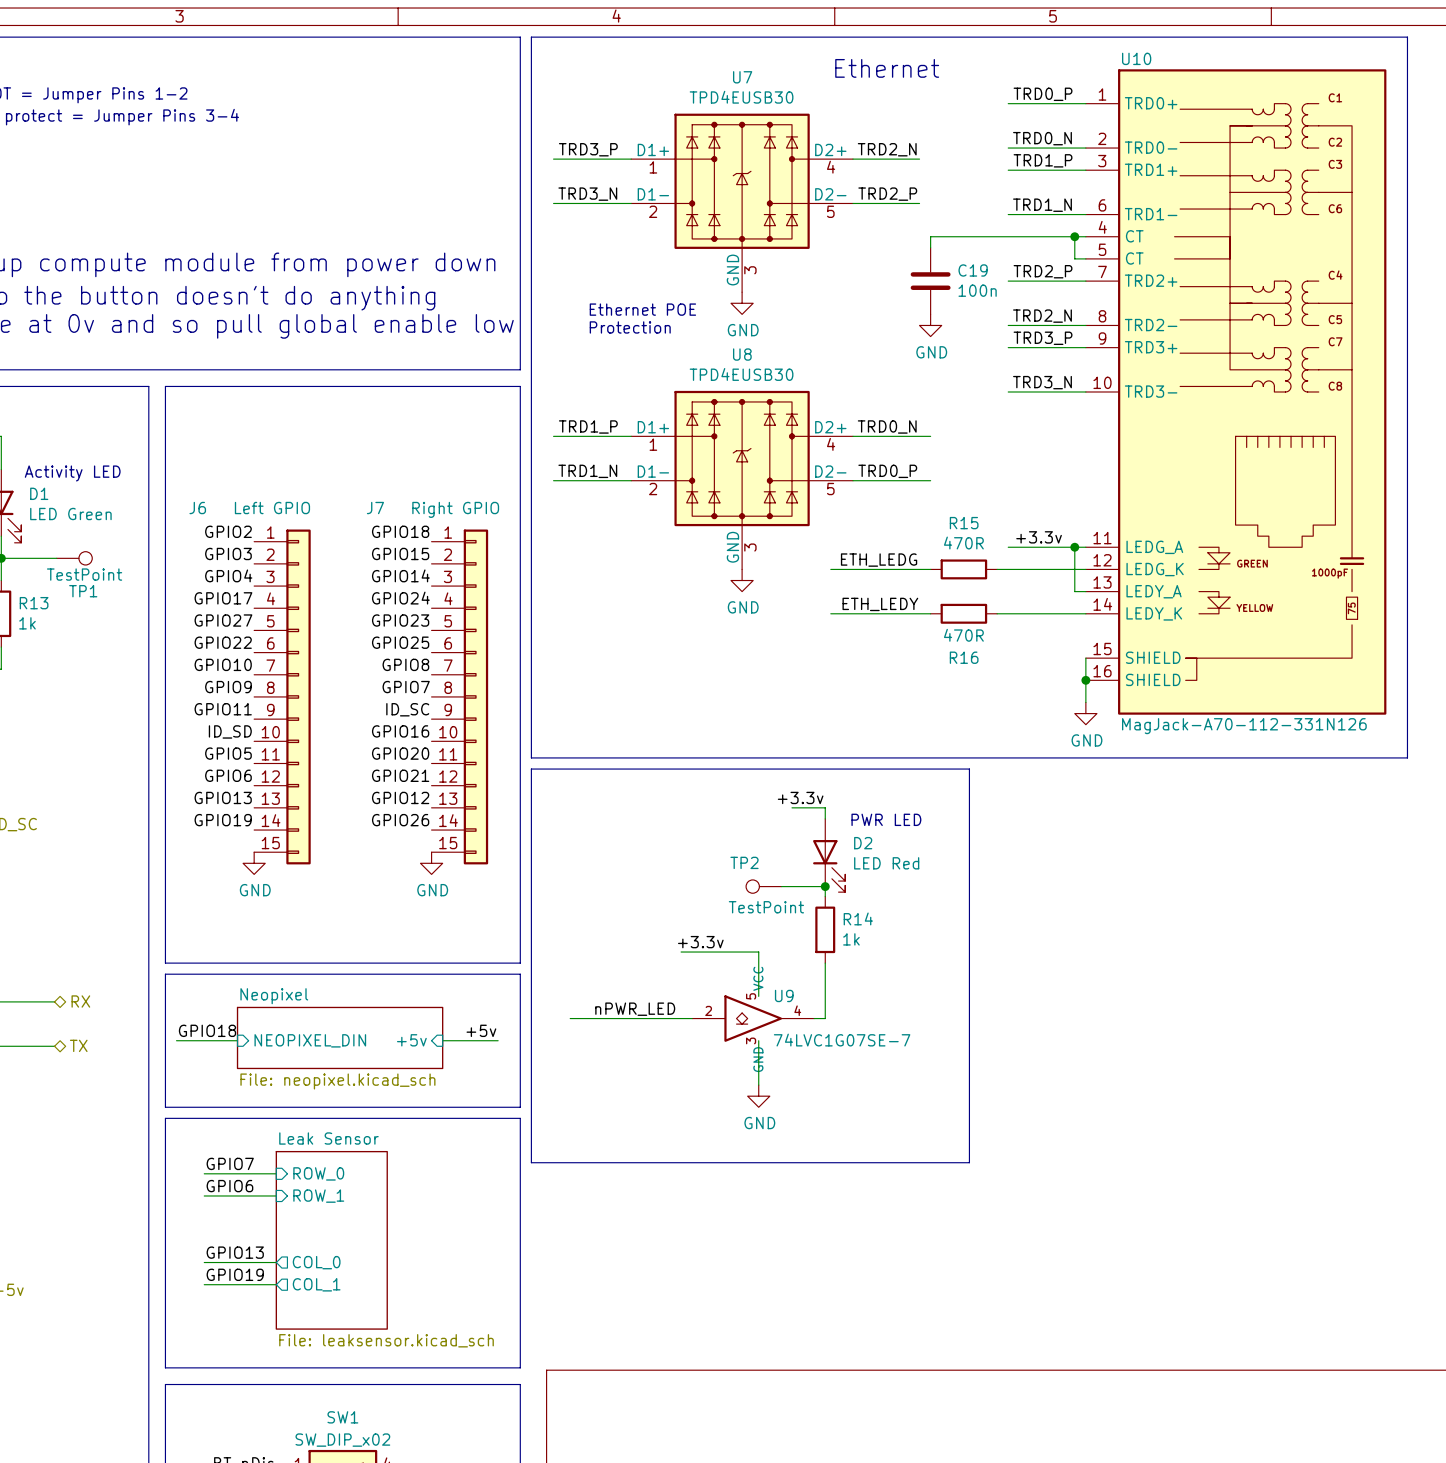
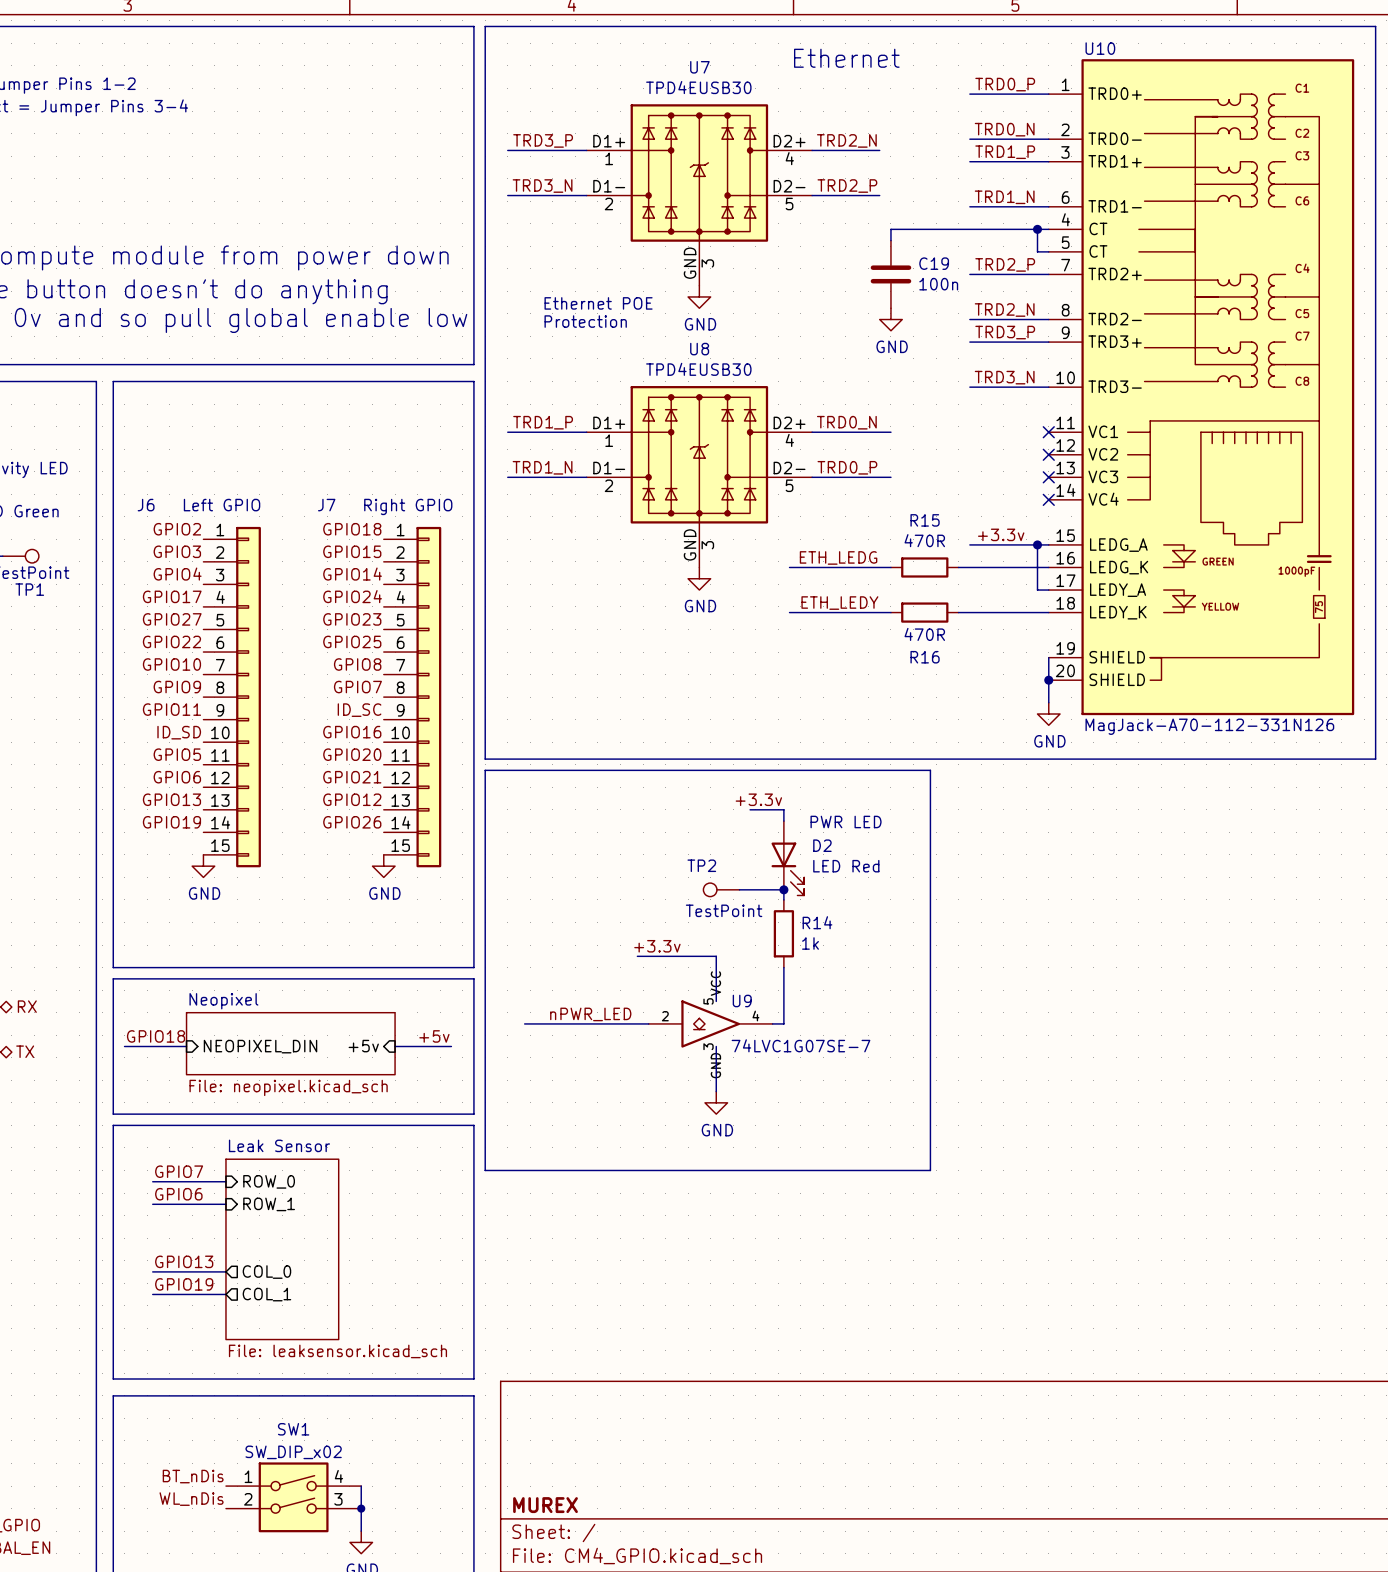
U10 symbol: [1085, 69, 1387, 715] -> [1048, 59, 1355, 716]
no-connect mark: none -> (1048, 432)
no-connect mark: none -> (1048, 454)
no-connect mark: none -> (1048, 477)
no-connect mark: none -> (1048, 499)

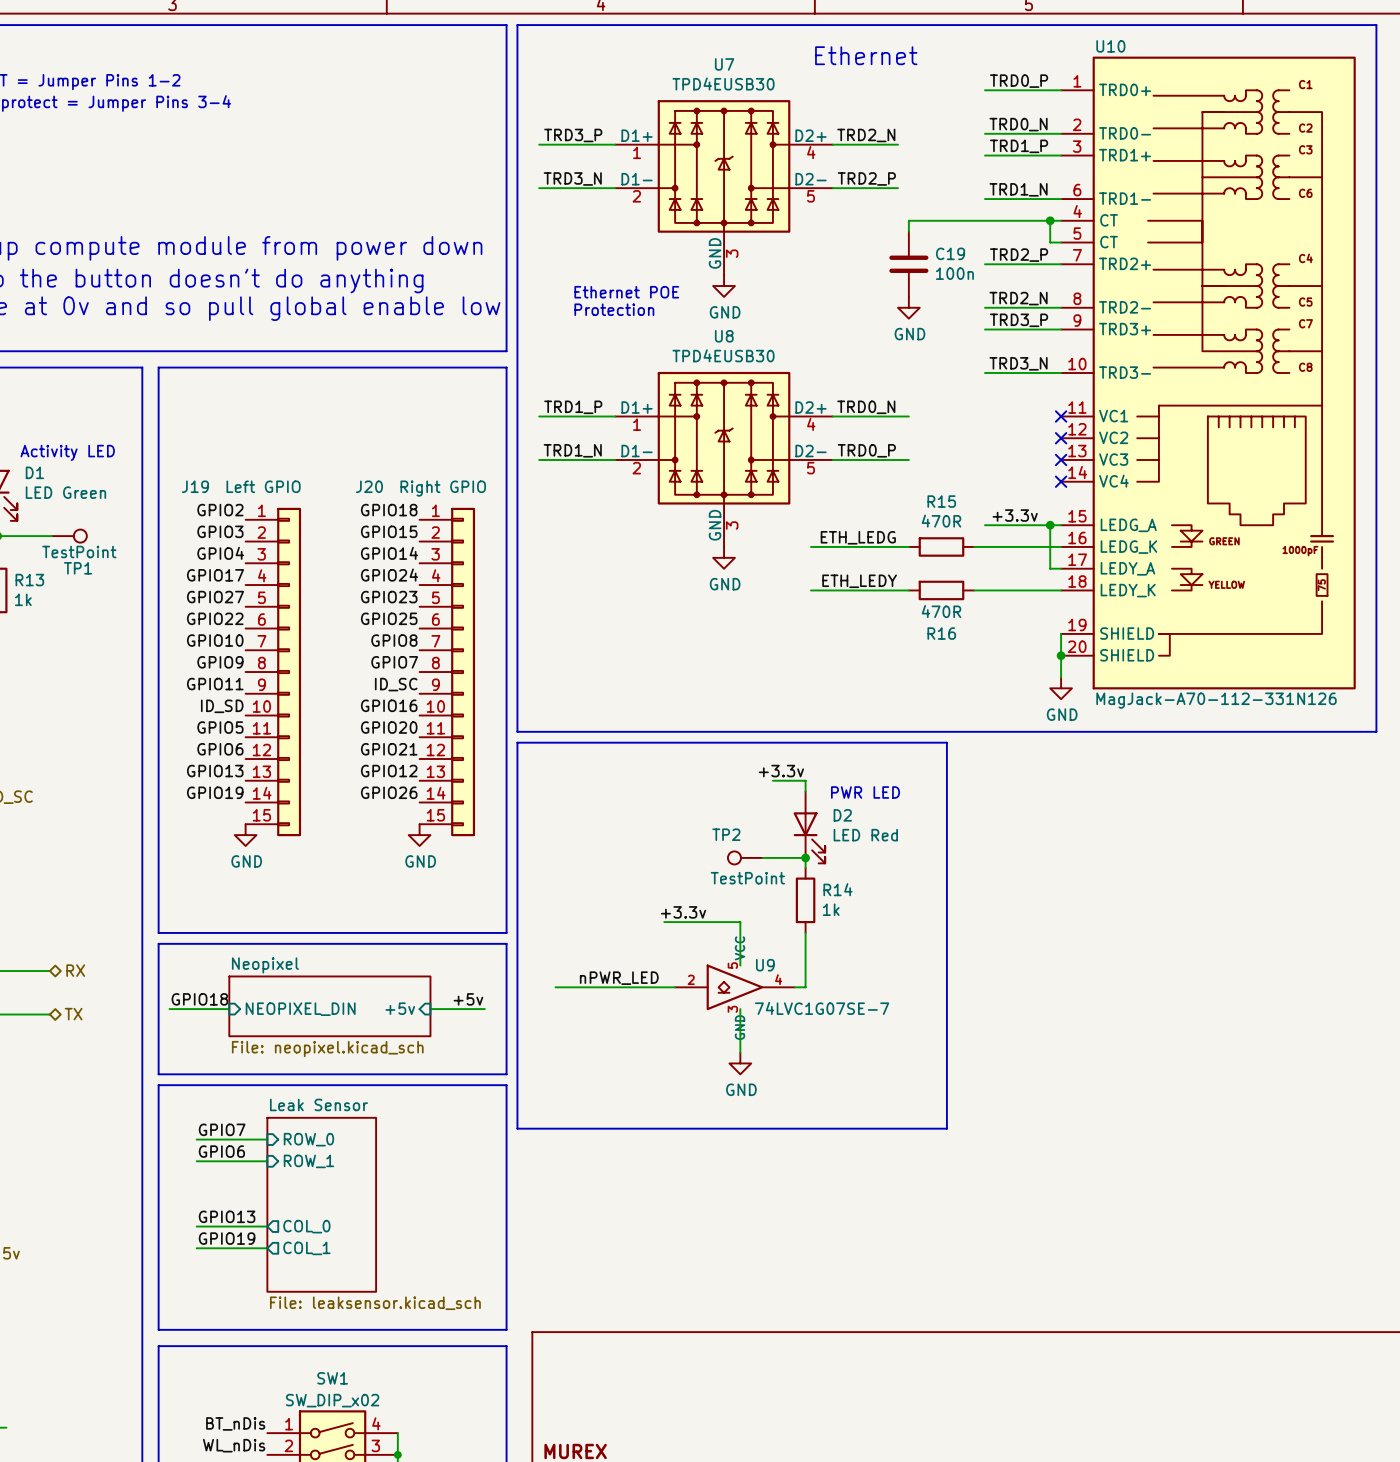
J6 name: J6 (146, 505) -> J19 (195, 486)
J7 name: J7 (326, 505) -> J20 (369, 486)

